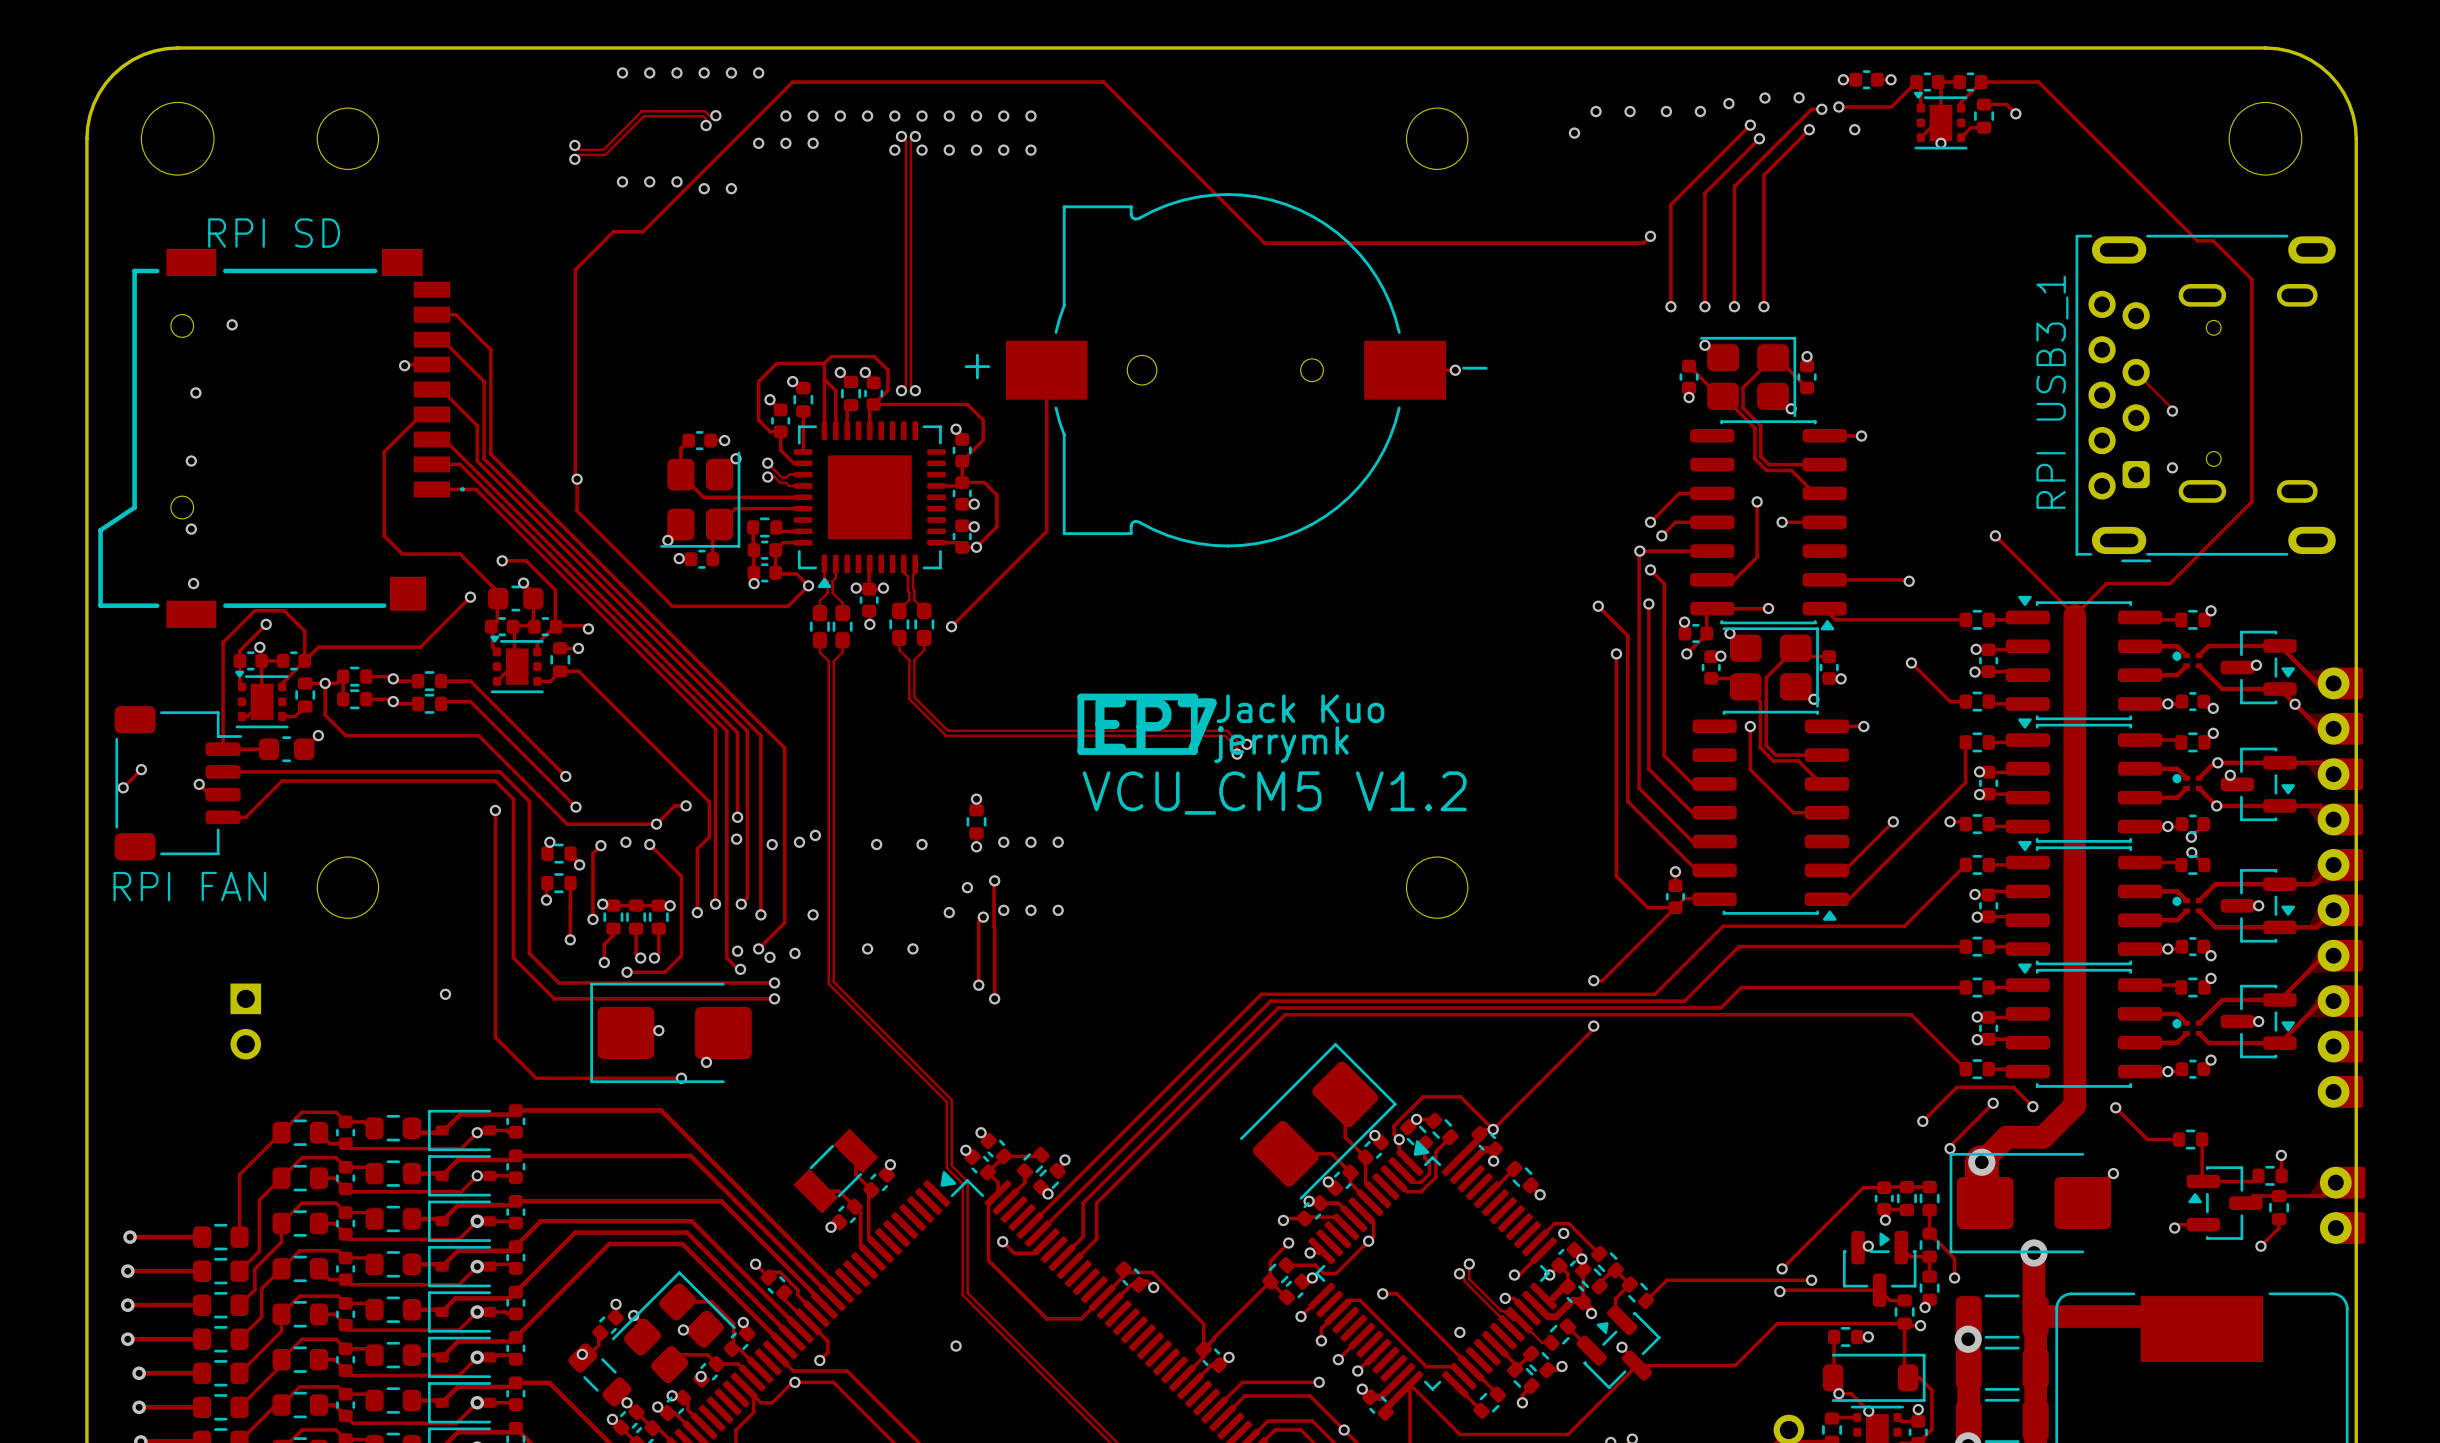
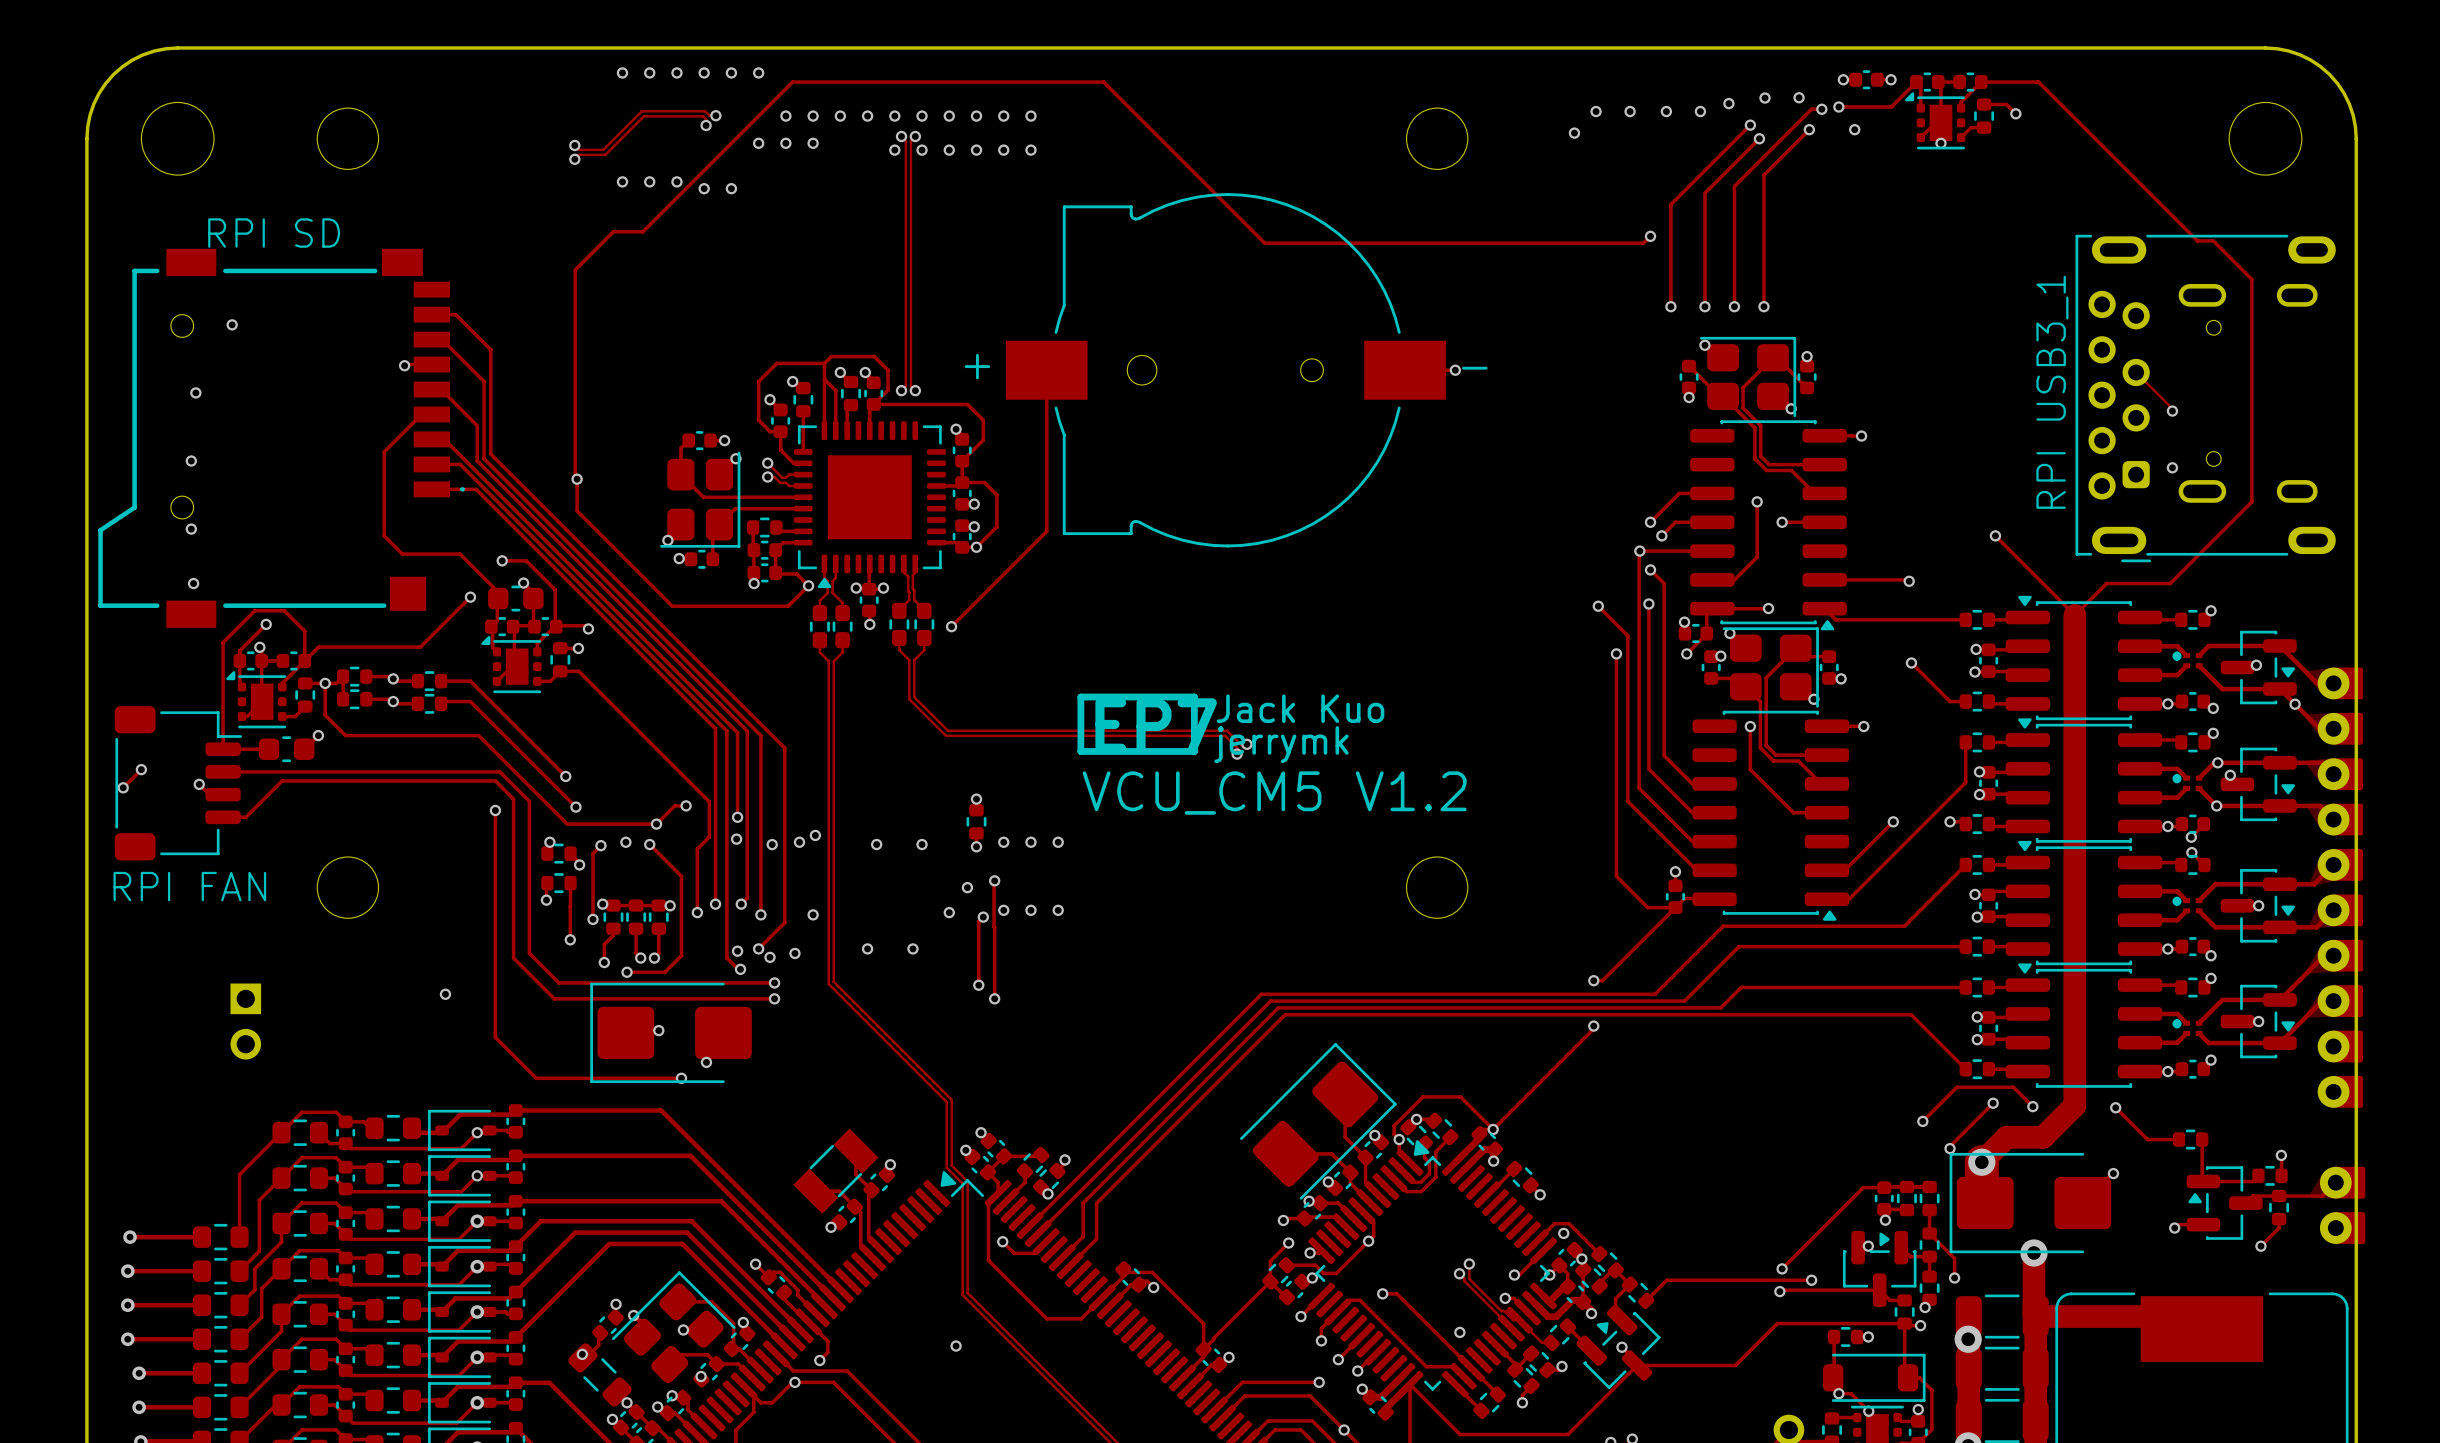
part footprint: [1913, 91, 1968, 150] -> [1905, 92, 1966, 150]
part footprint: [490, 635, 544, 694] -> [481, 635, 542, 694]
part footprint: [235, 670, 289, 729] -> [226, 671, 287, 729]

